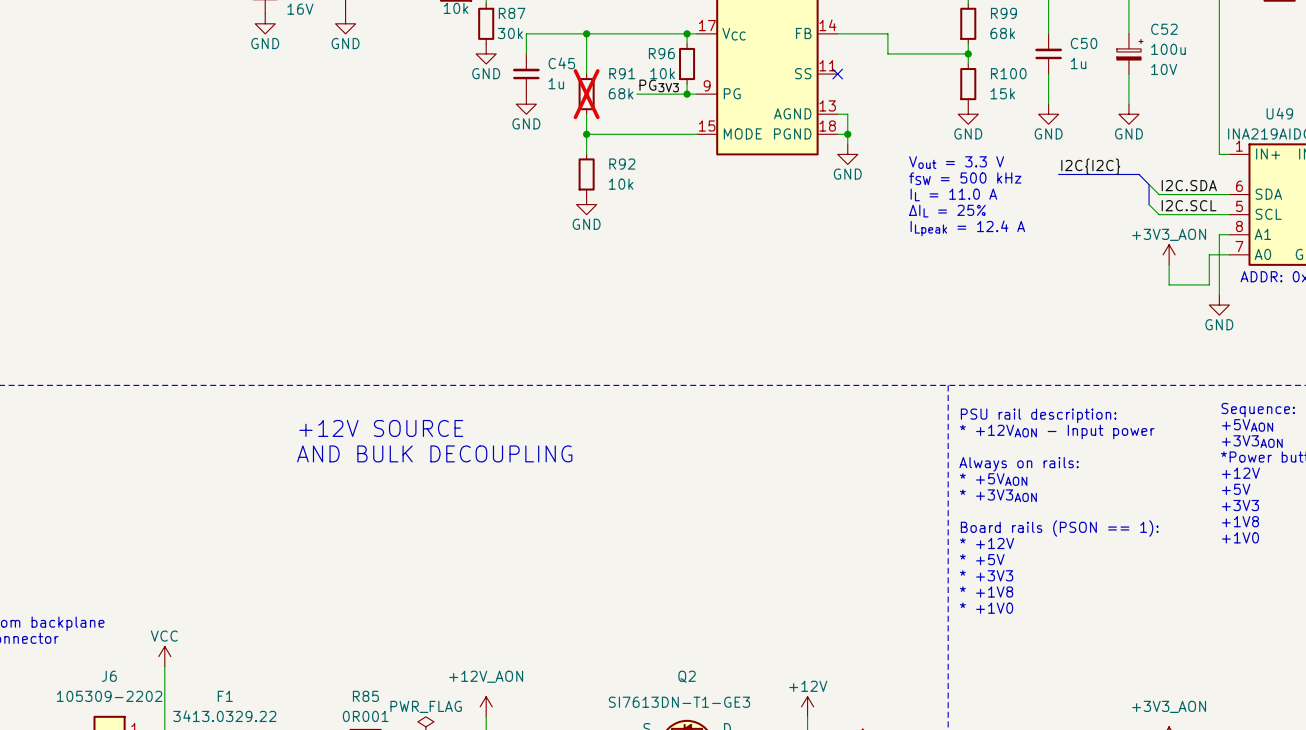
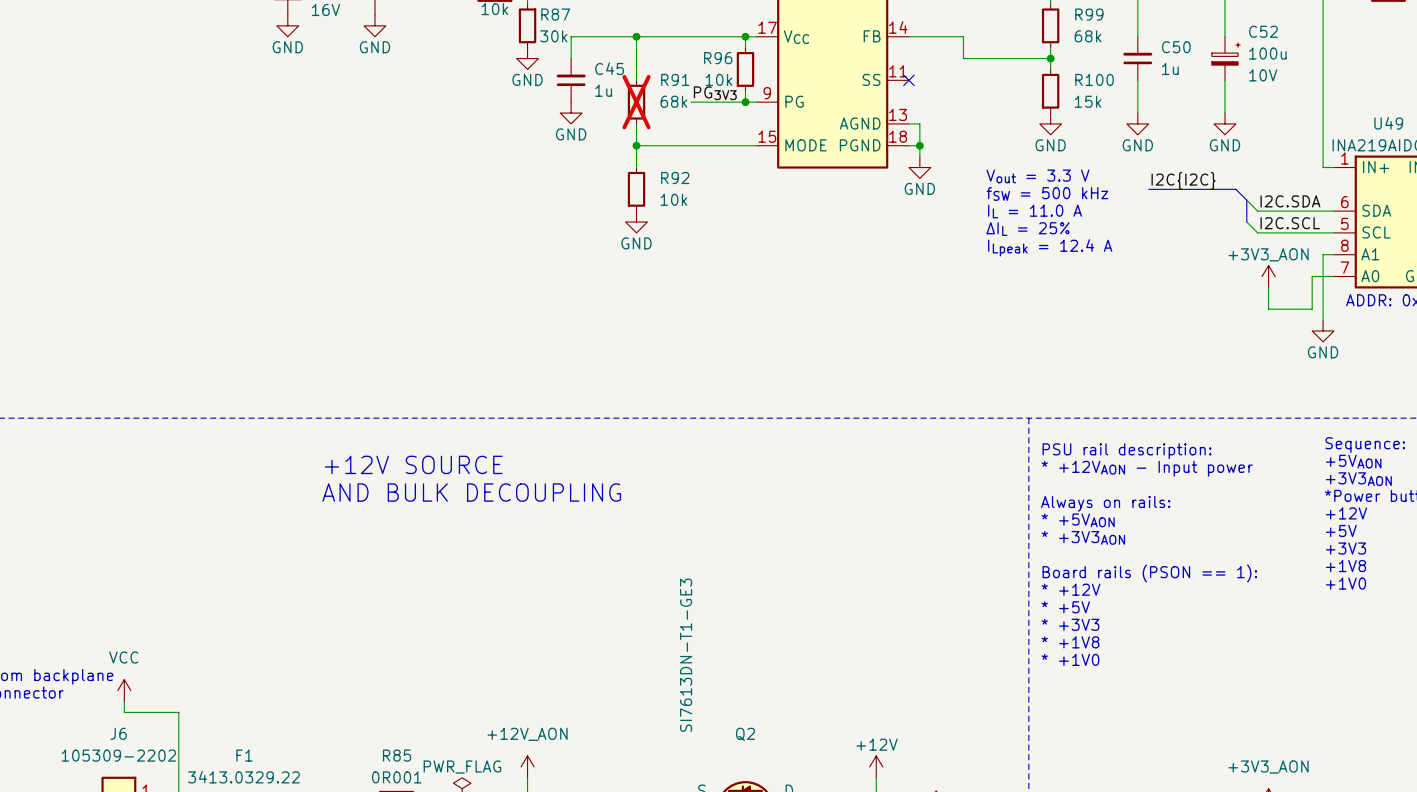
power symbol text position: VCC (164, 636) -> VCC (123, 657)
wire: none -> (124, 701) (124, 712) (178, 712) (178, 723)
power symbol position: VCC (164, 656) -> VCC (124, 690)
Q2 text rotation: 0° (679, 702) -> 90° counterclockwise (686, 655)

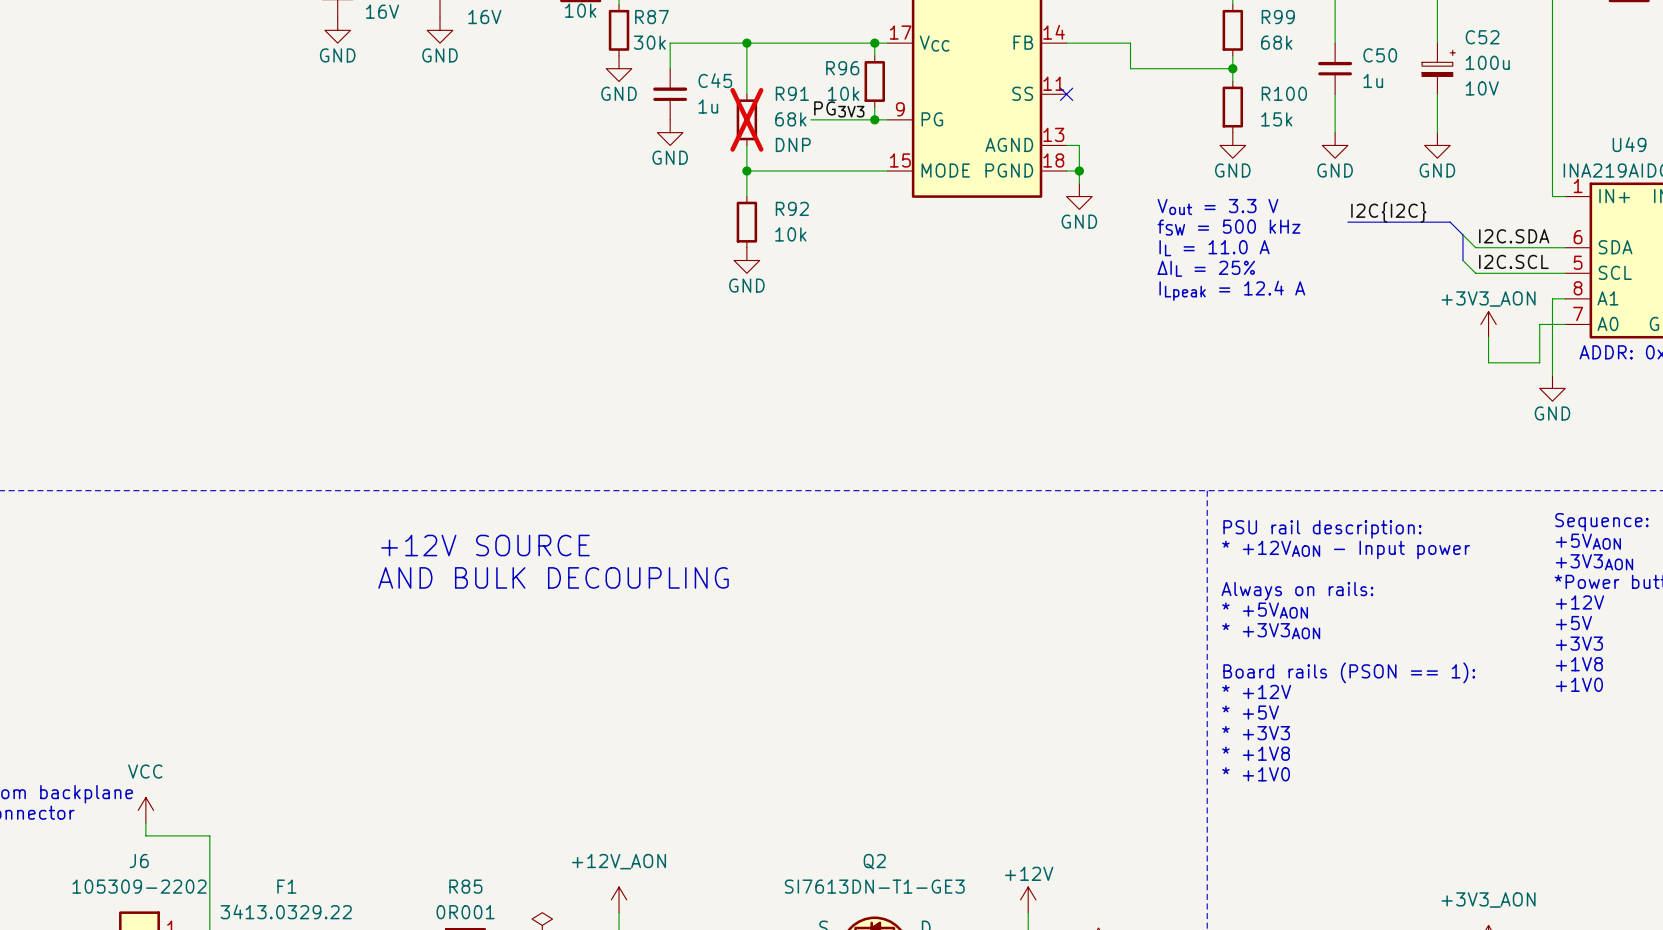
part text: none -> 16V (484, 17)
R91 text: none -> DNP (793, 144)
Q2 text: SI7613DN-T1-GE3 (686, 655) -> none
Q2 value: none -> SI7613DN-T1-GE3 (874, 886)
power symbol text: PWR_FLAG (462, 767) -> none

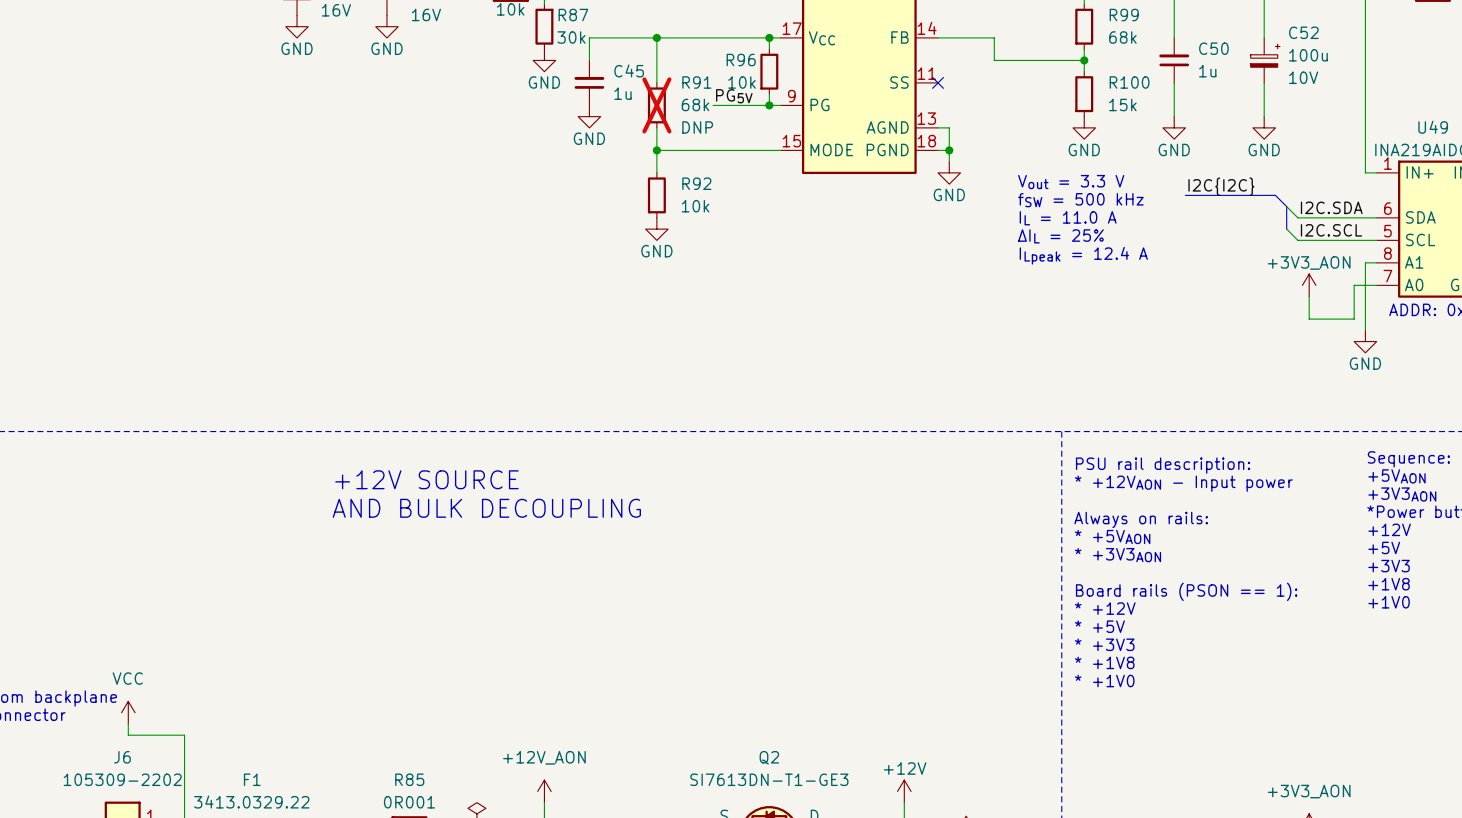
label: PG3V3 (839, 109) -> PG5V (734, 96)

